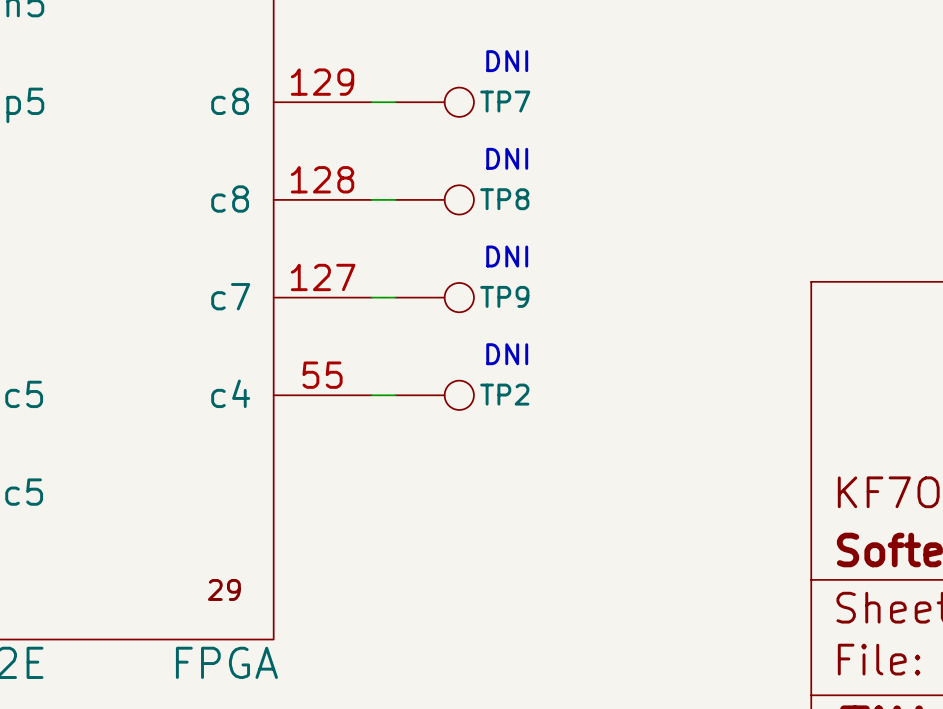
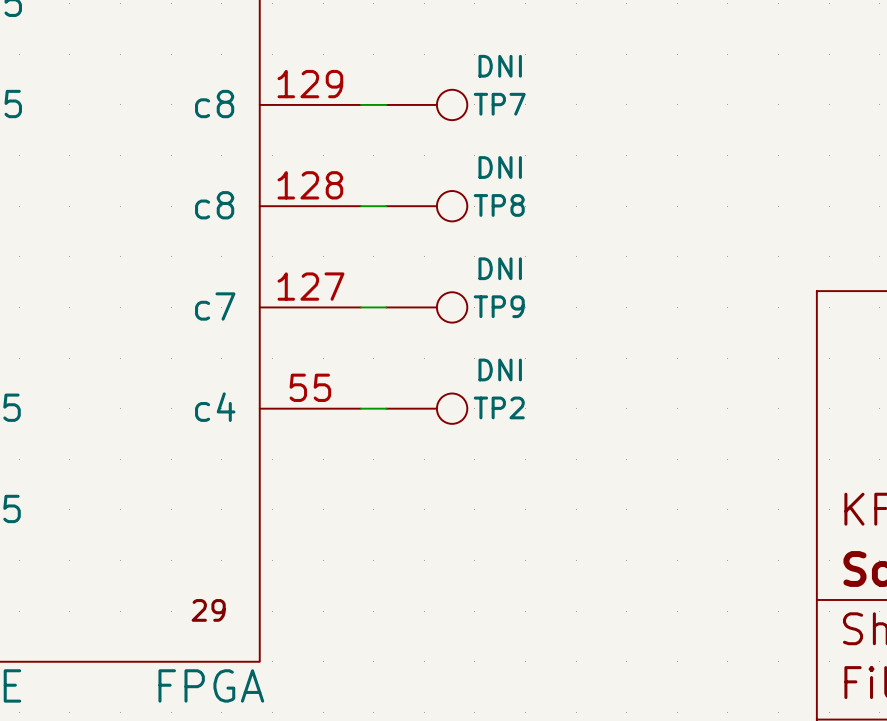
text: DNI (507, 61) -> none
TP7 text: none -> DNI (500, 66)
text: DNI (507, 158) -> none
TP8 text: none -> DNI (500, 167)
text: DNI (507, 256) -> none
TP9 text: none -> DNI (500, 268)
text: DNI (507, 354) -> none
TP2 text: none -> DNI (500, 369)

